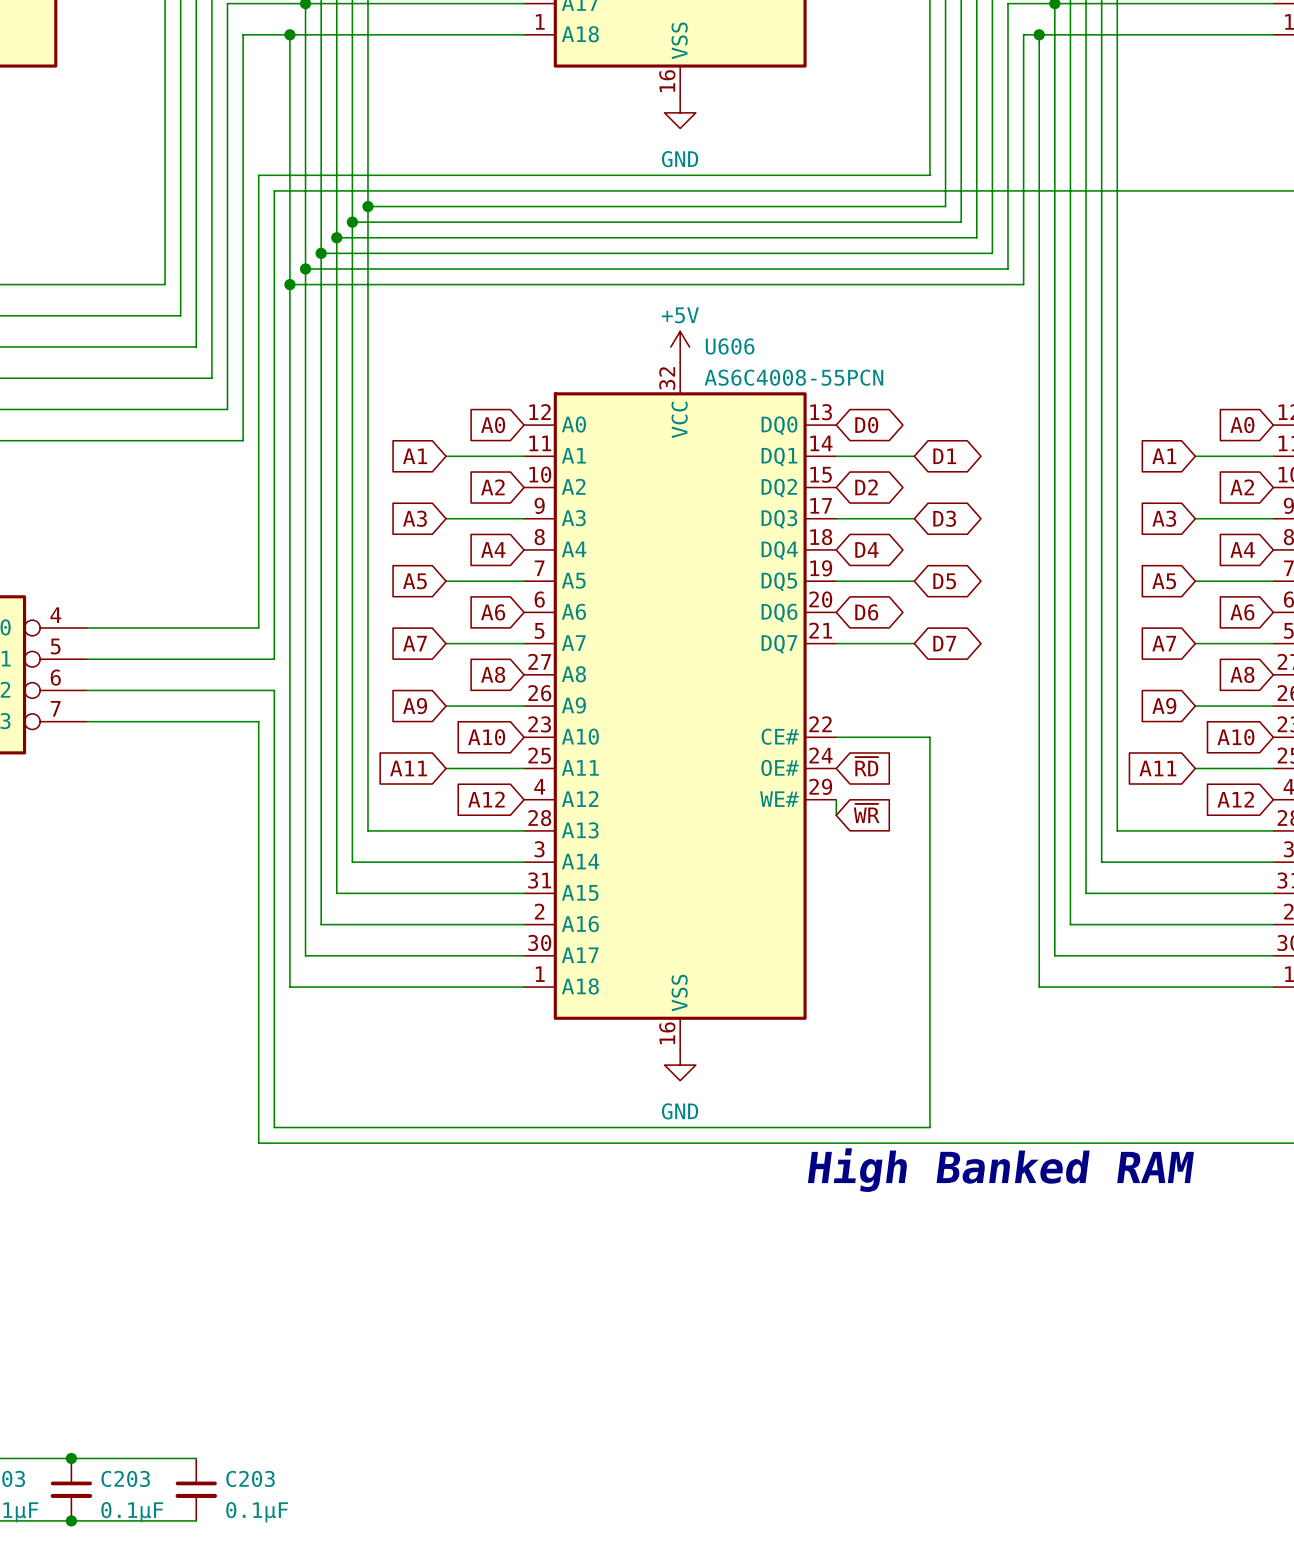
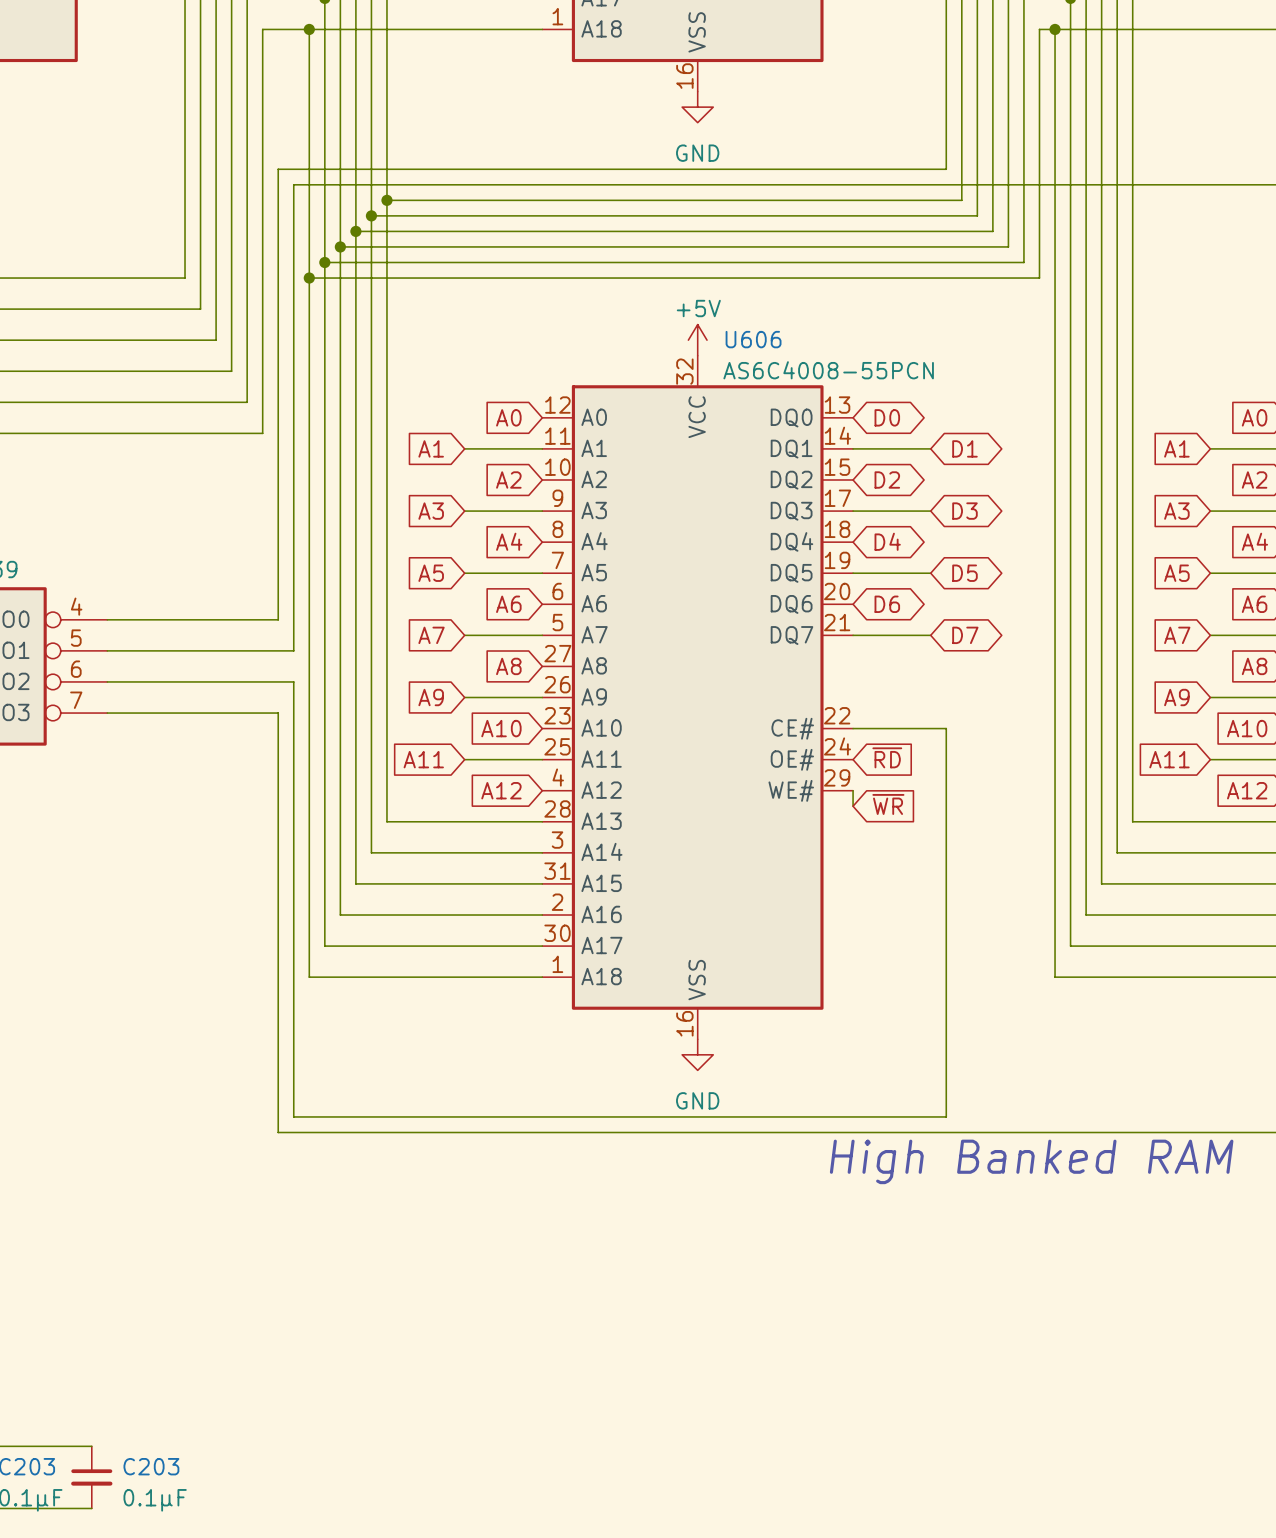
wire: (71, 1458) (196, 1458) -> none
junction: (71, 1458) -> none
C203: 0.1µF (196, 1489) -> none
wire: (71, 1520) (196, 1520) -> none
junction: (71, 1520) -> none

